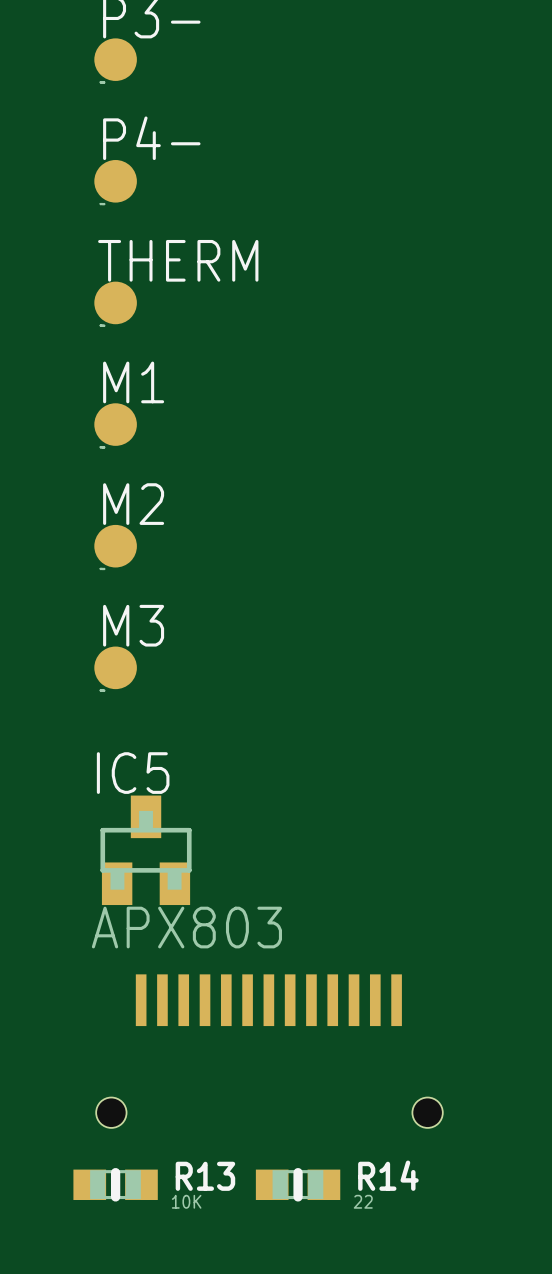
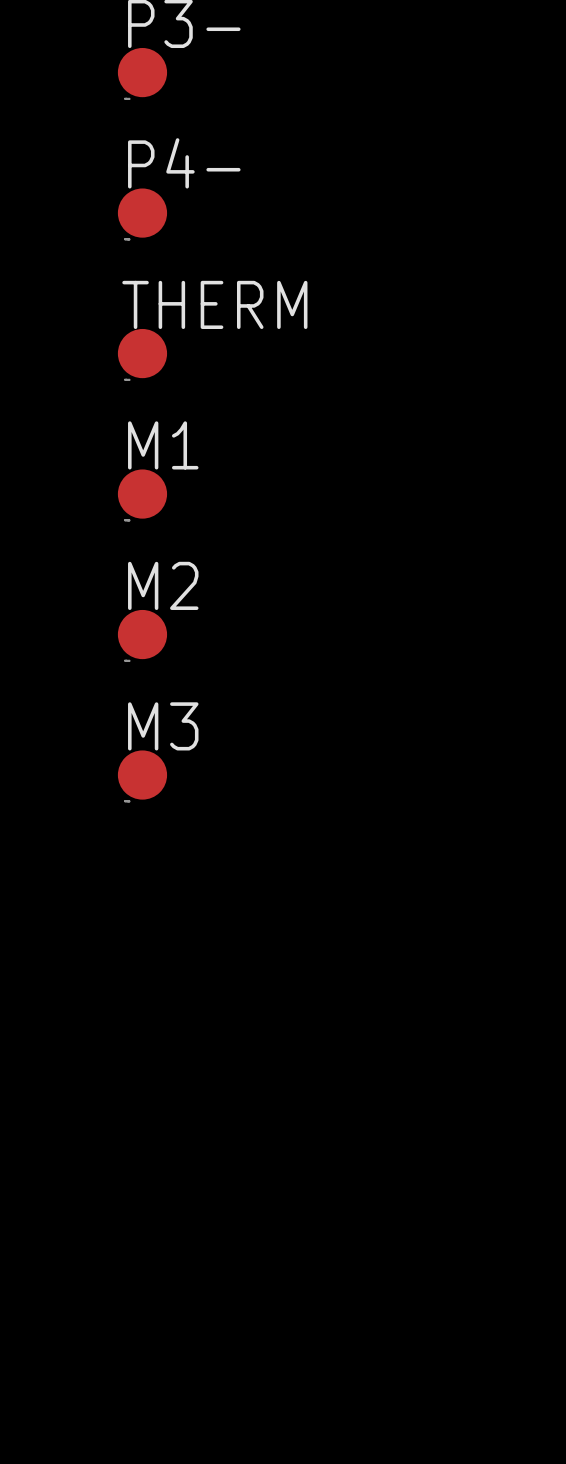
IC5: APX803 (146, 850) -> none
part: (269, 1051) -> none
R13: 10K (115, 1184) -> none
R14: 22 (298, 1184) -> none

